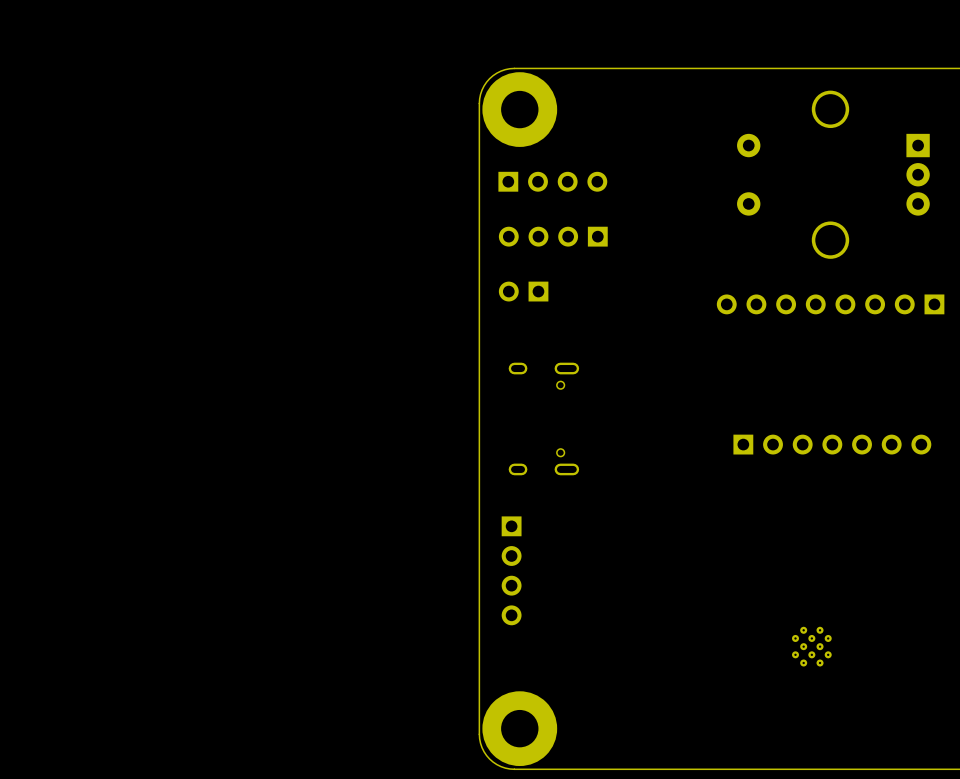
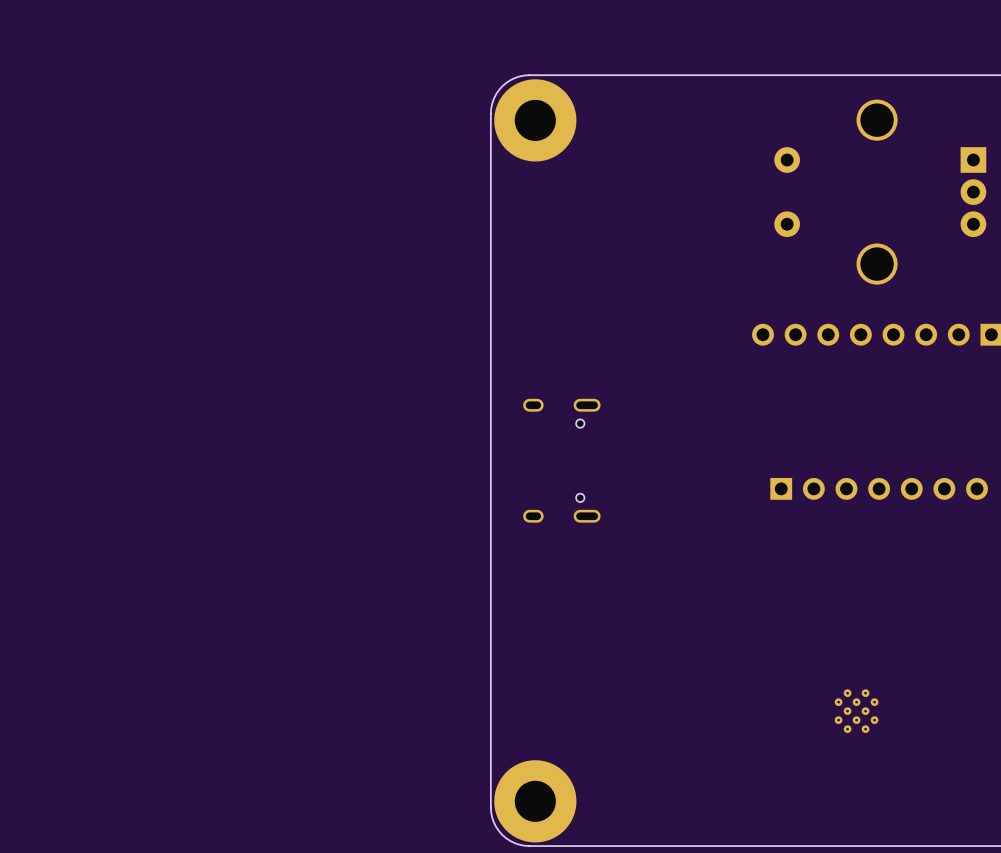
part: (552, 181) -> none
part: (553, 236) -> none
part: (523, 291) -> none
part: (511, 570) -> none

